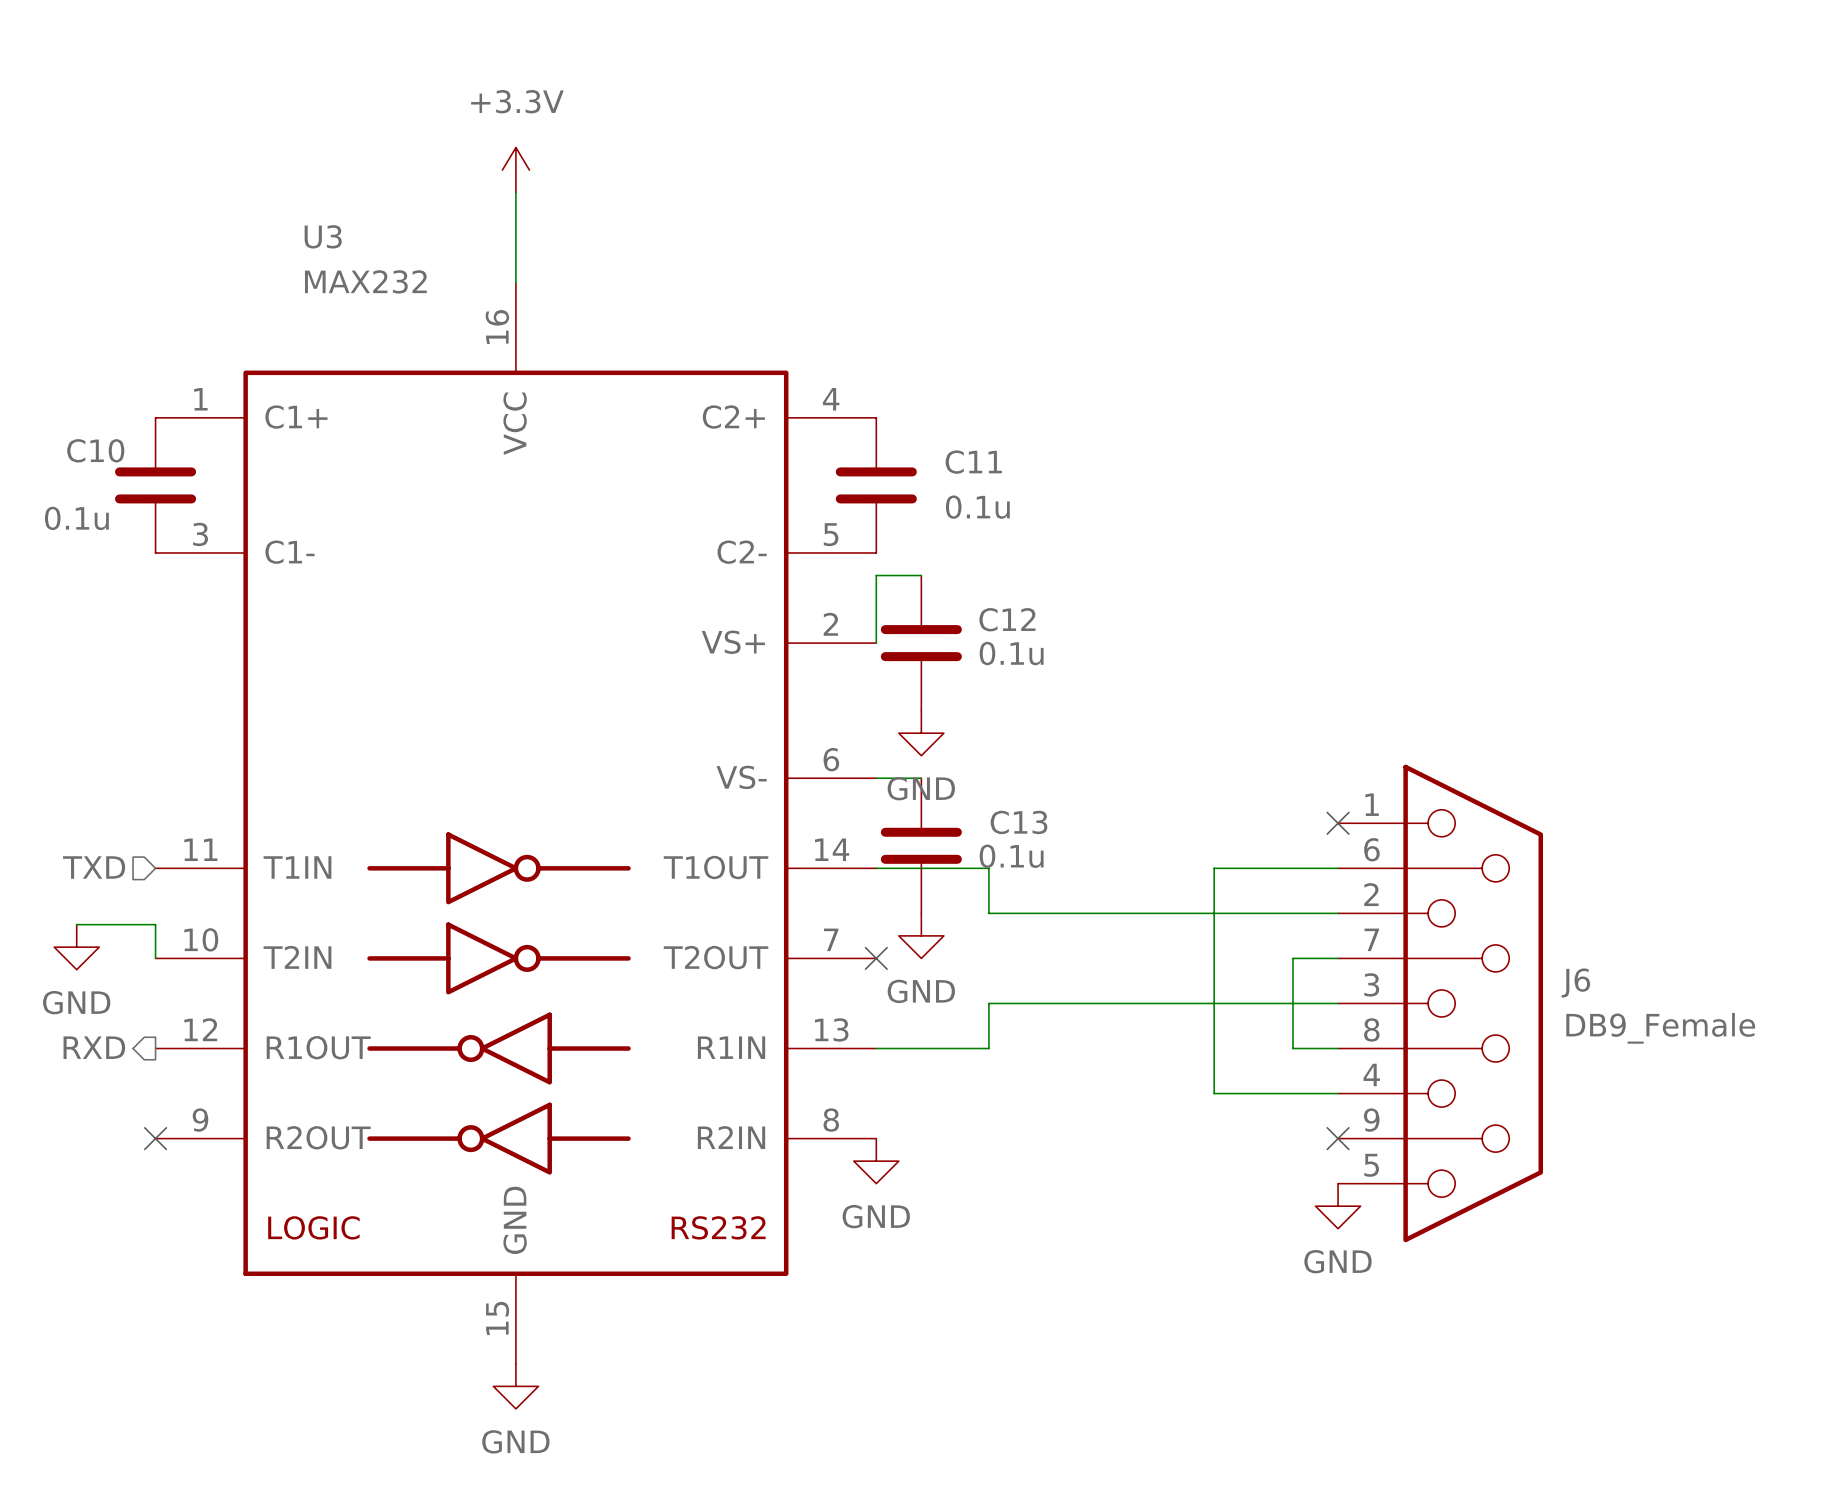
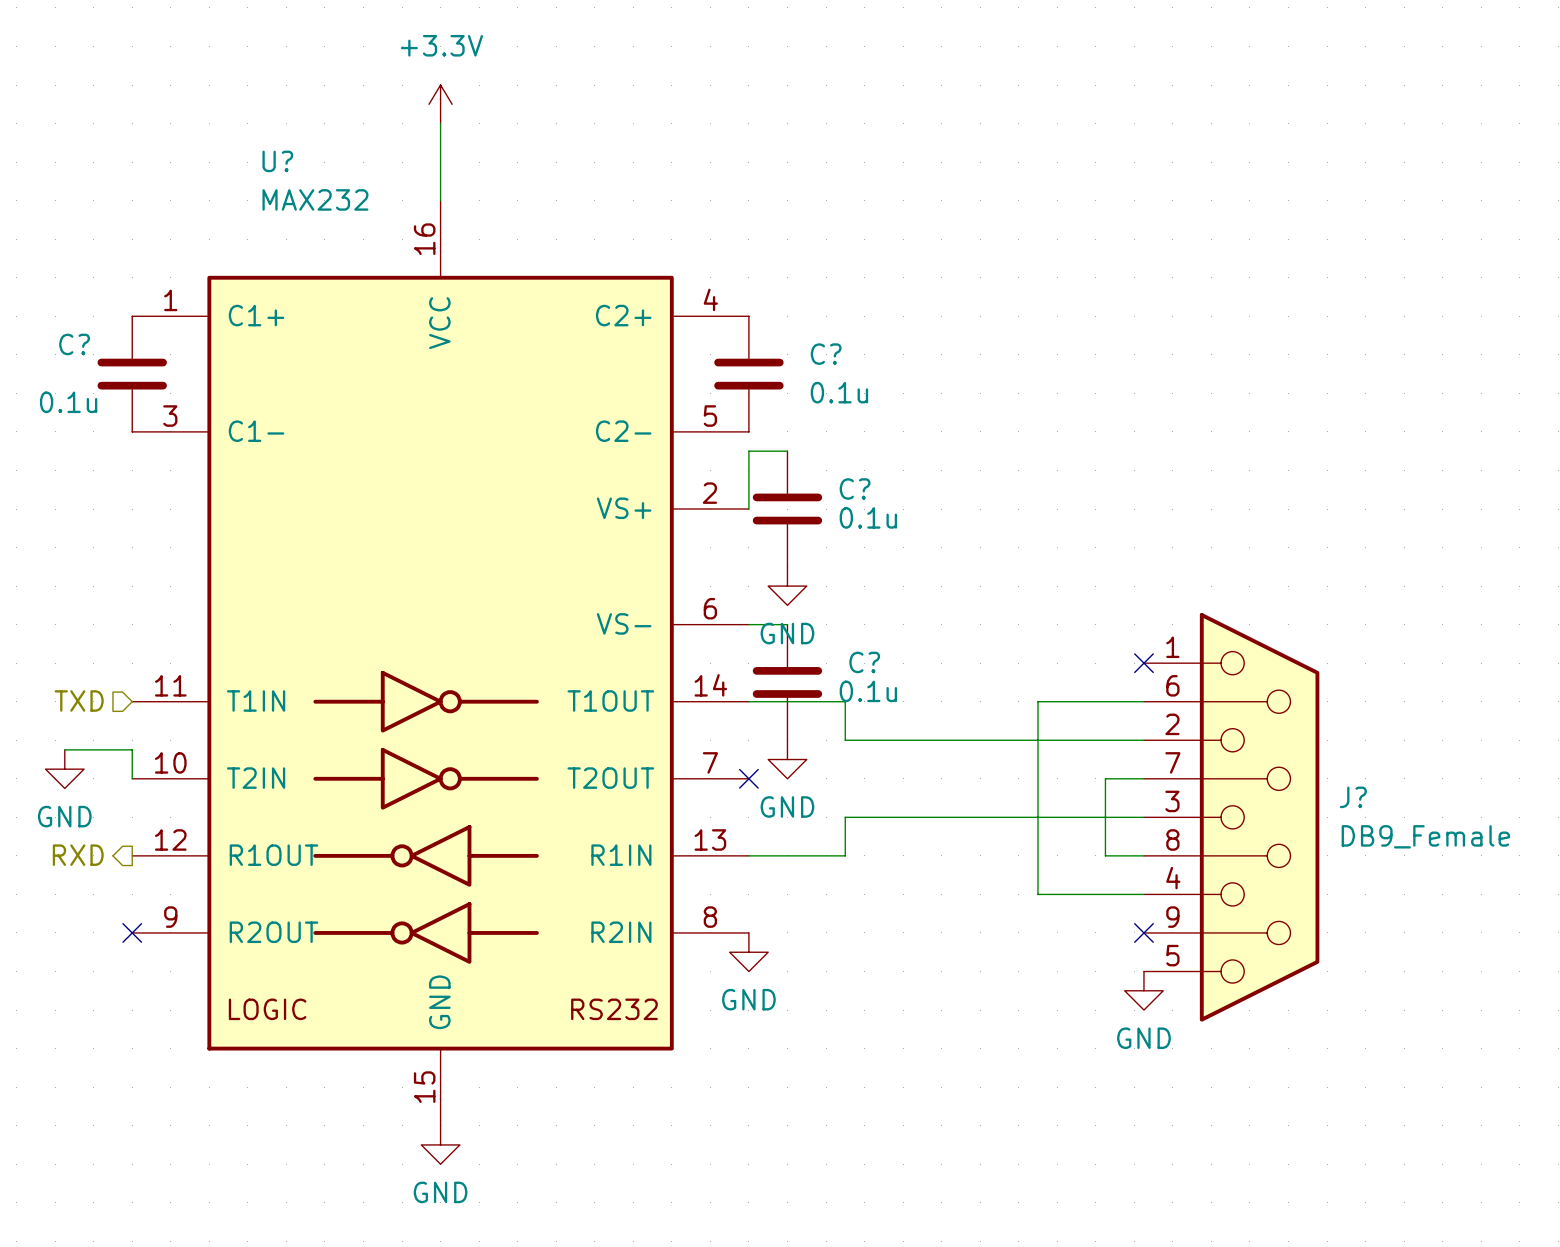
U3 name: U3 (323, 236) -> U? (277, 161)
C10 name: C10 (95, 450) -> C? (74, 344)
C11 name: C11 (973, 462) -> C? (826, 354)
C12 name: C12 (1007, 619) -> C? (855, 489)
C13 name: C13 (1018, 822) -> C? (864, 662)
J6 name: J6 (1575, 982) -> J? (1353, 797)

